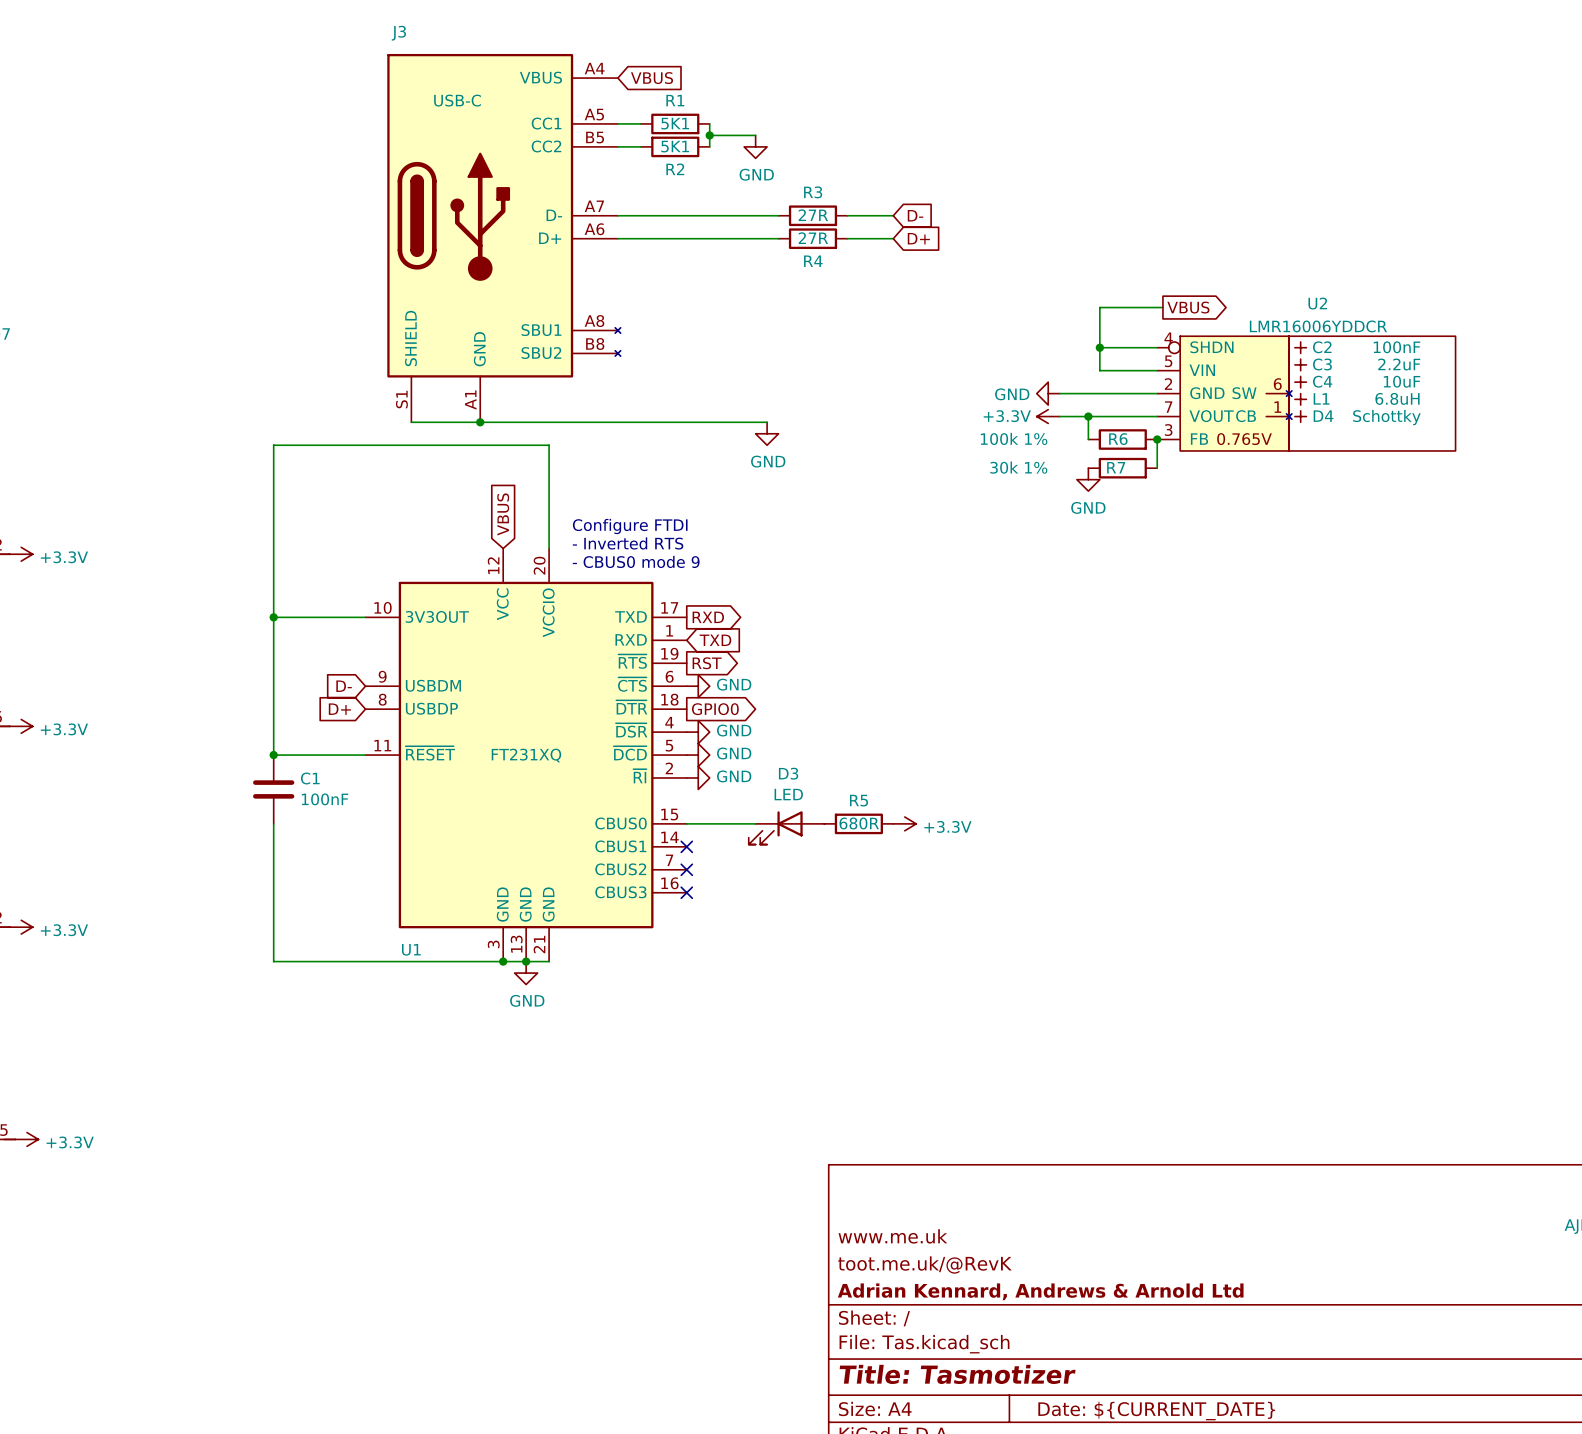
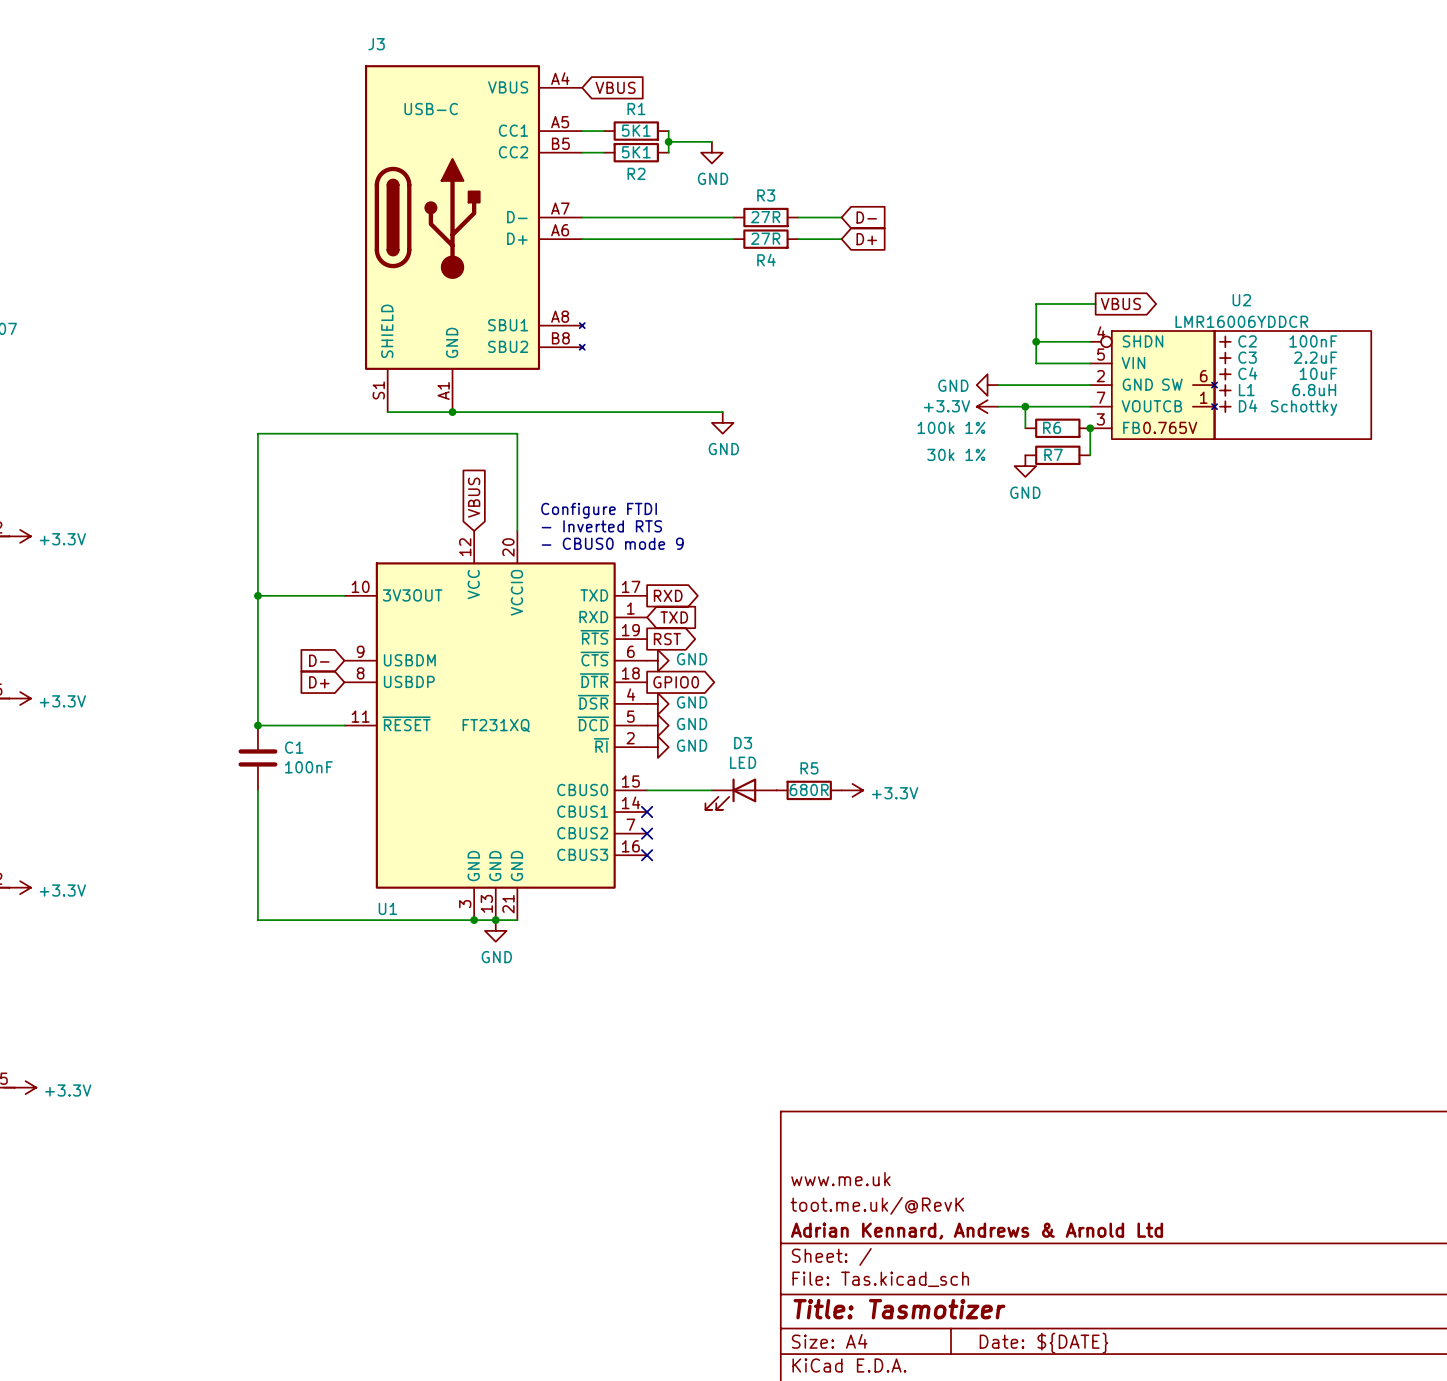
title block: Date: ${CURRENT_DATE} (1156, 1411) -> Date: ${DATE} (1043, 1343)

